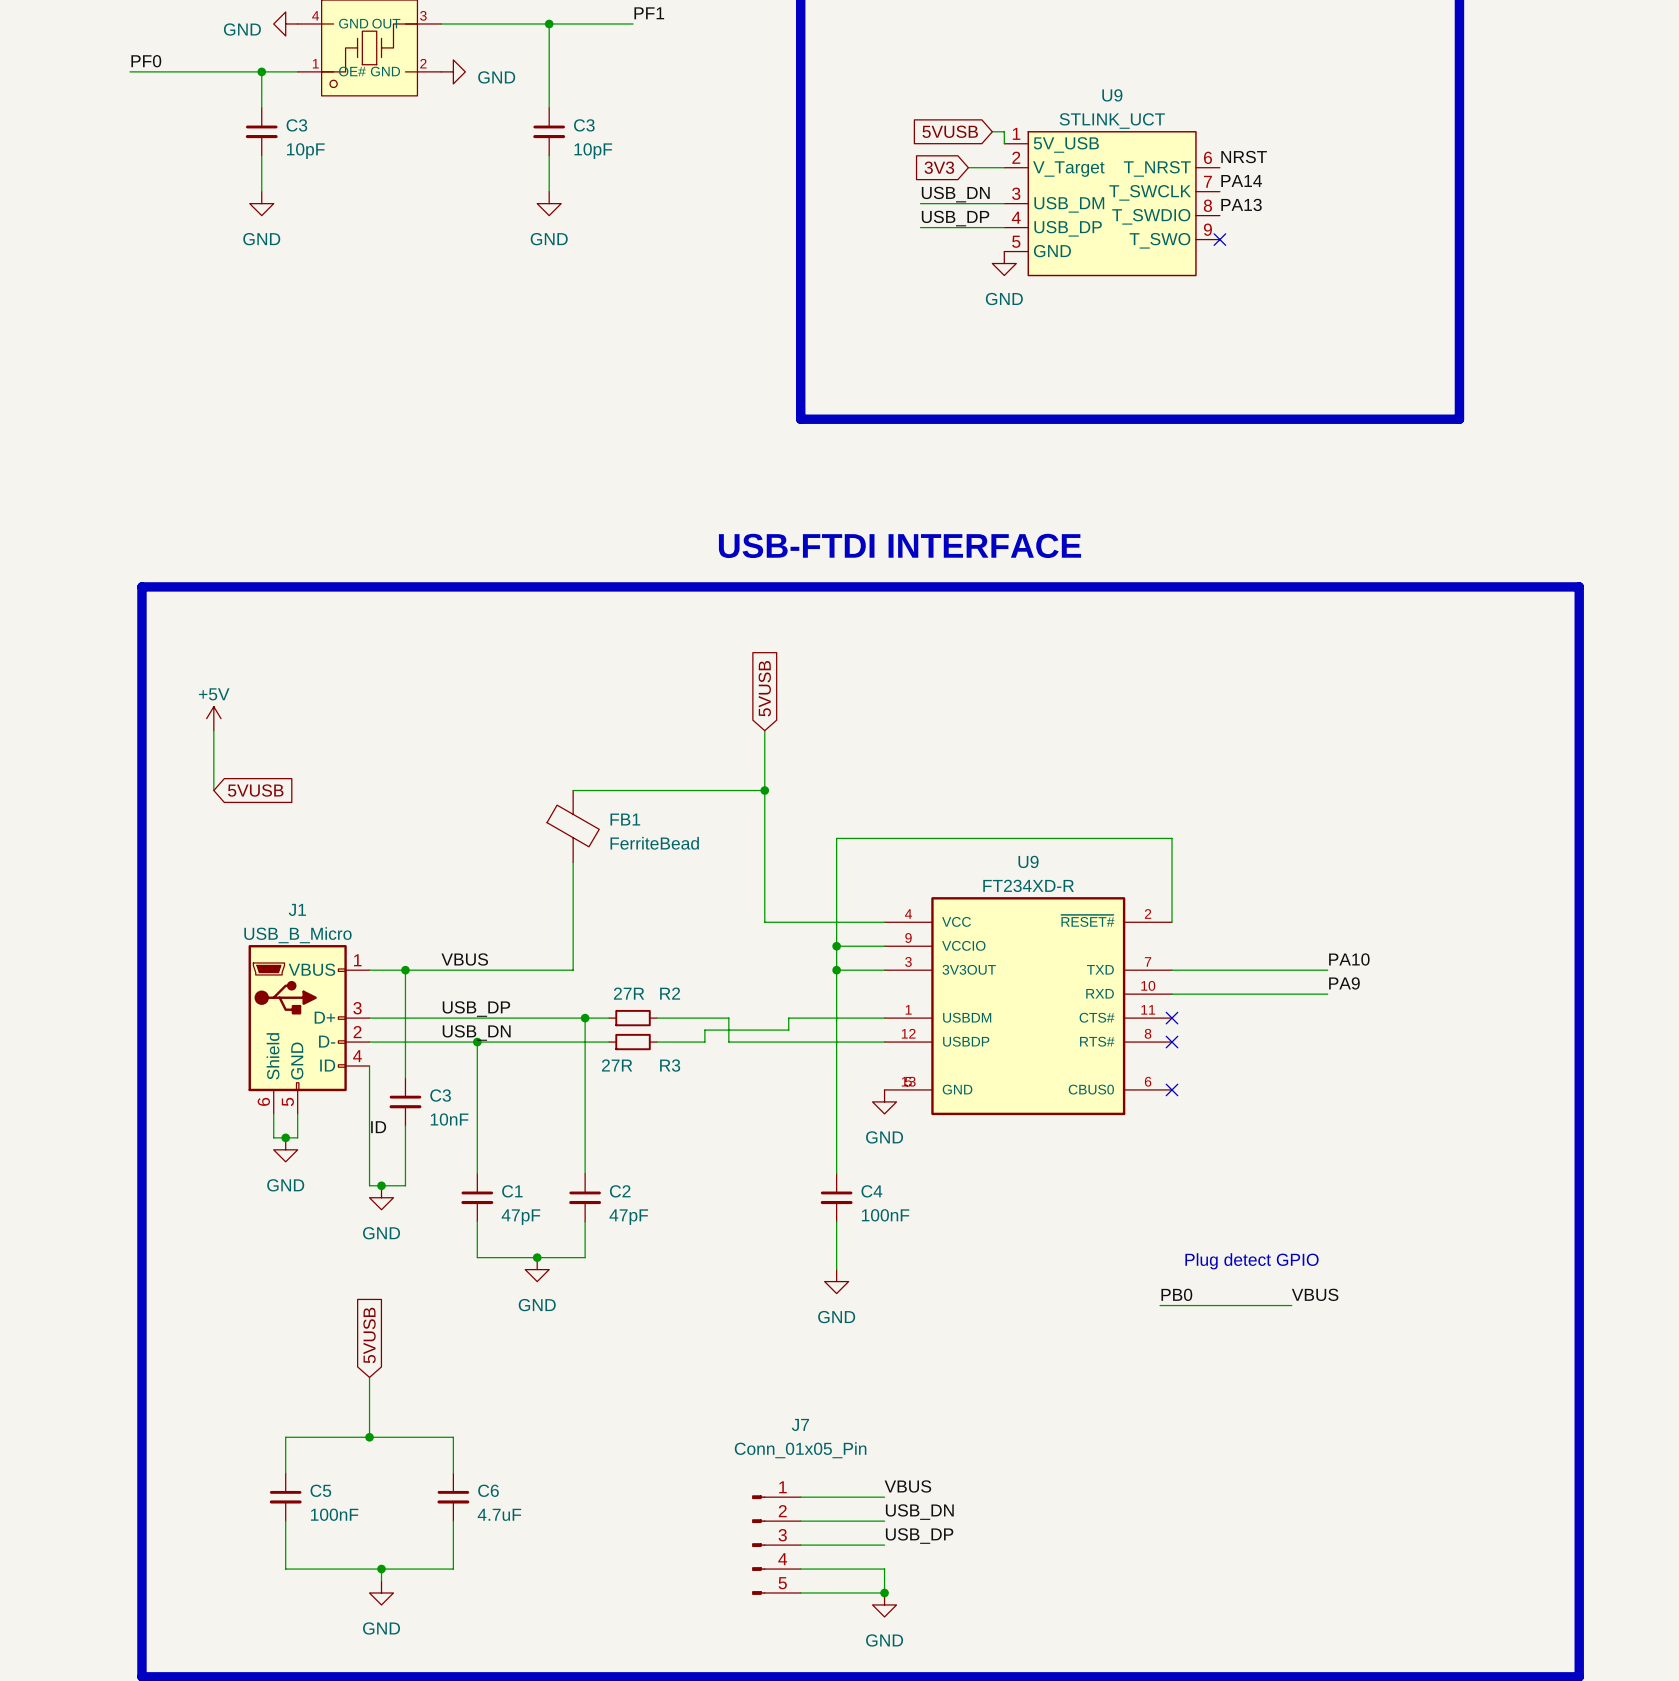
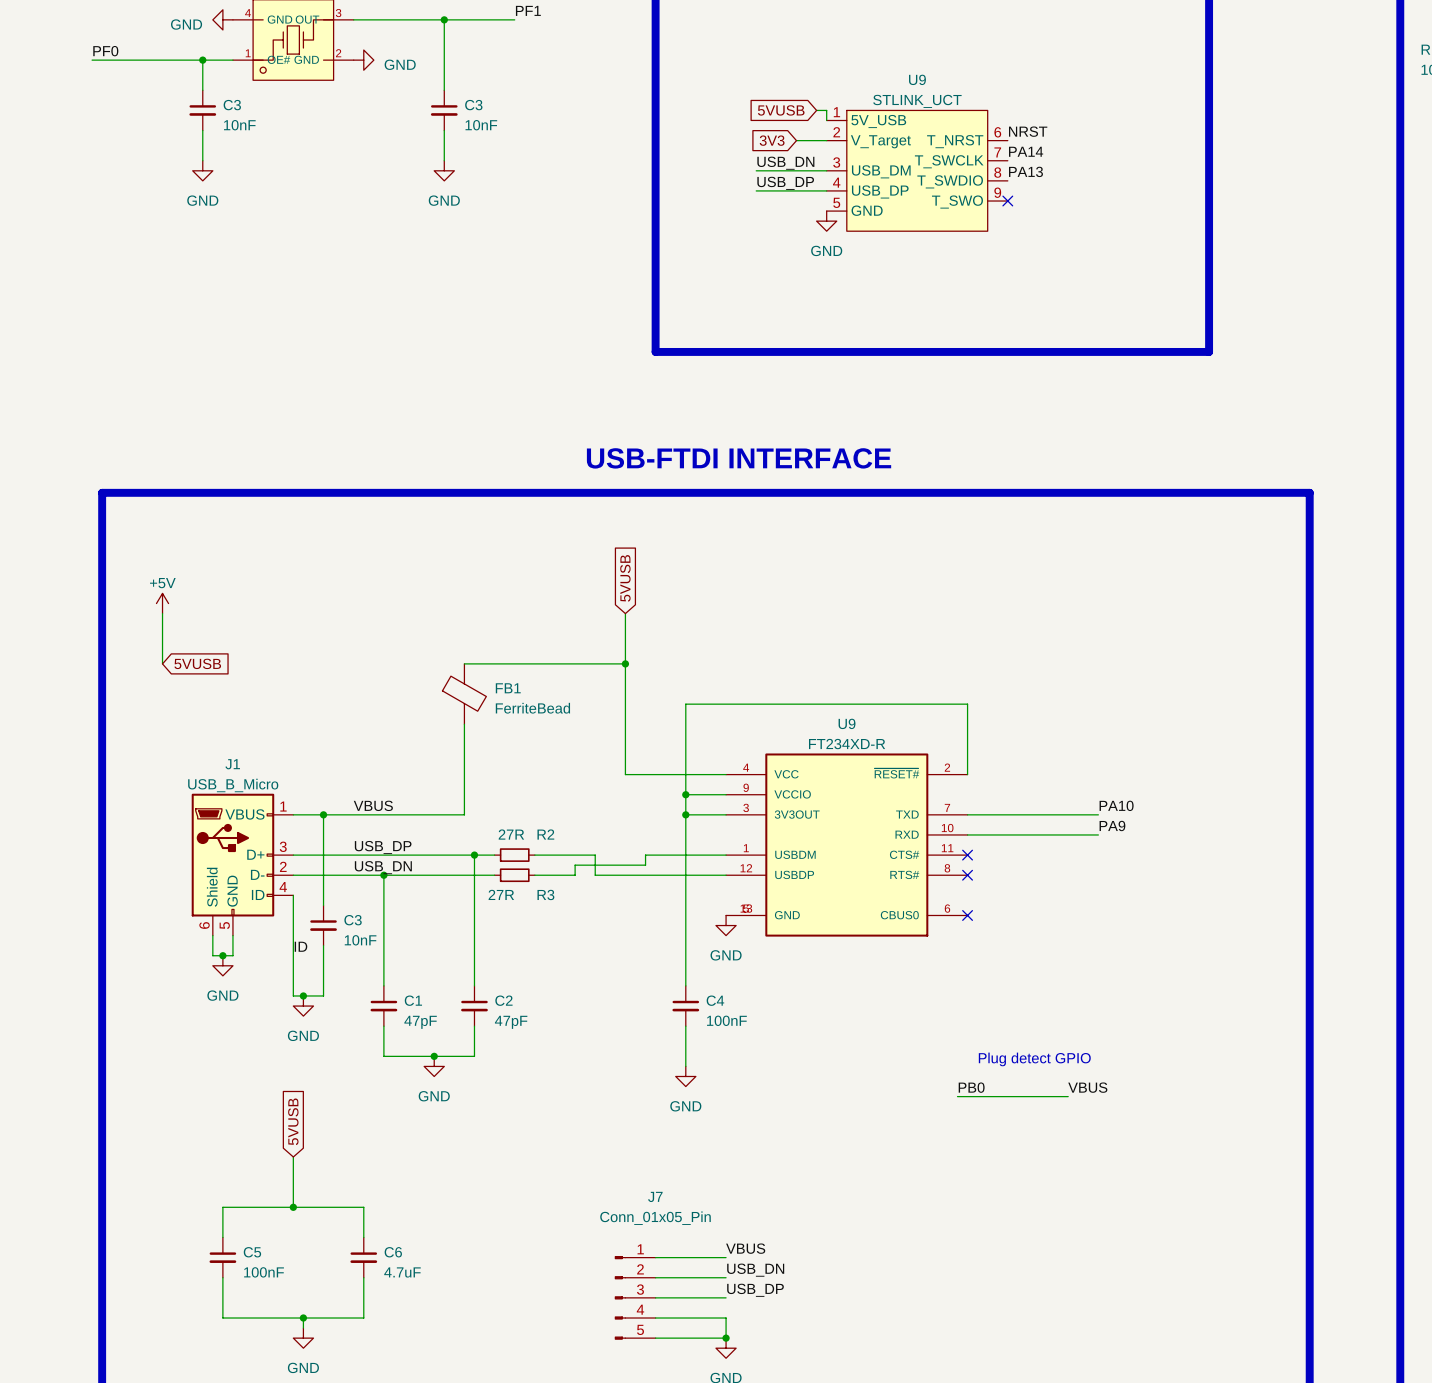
C3 value: 10pF (305, 151) -> 10nF (239, 125)
C3 value: 10pF (593, 151) -> 10nF (481, 125)

